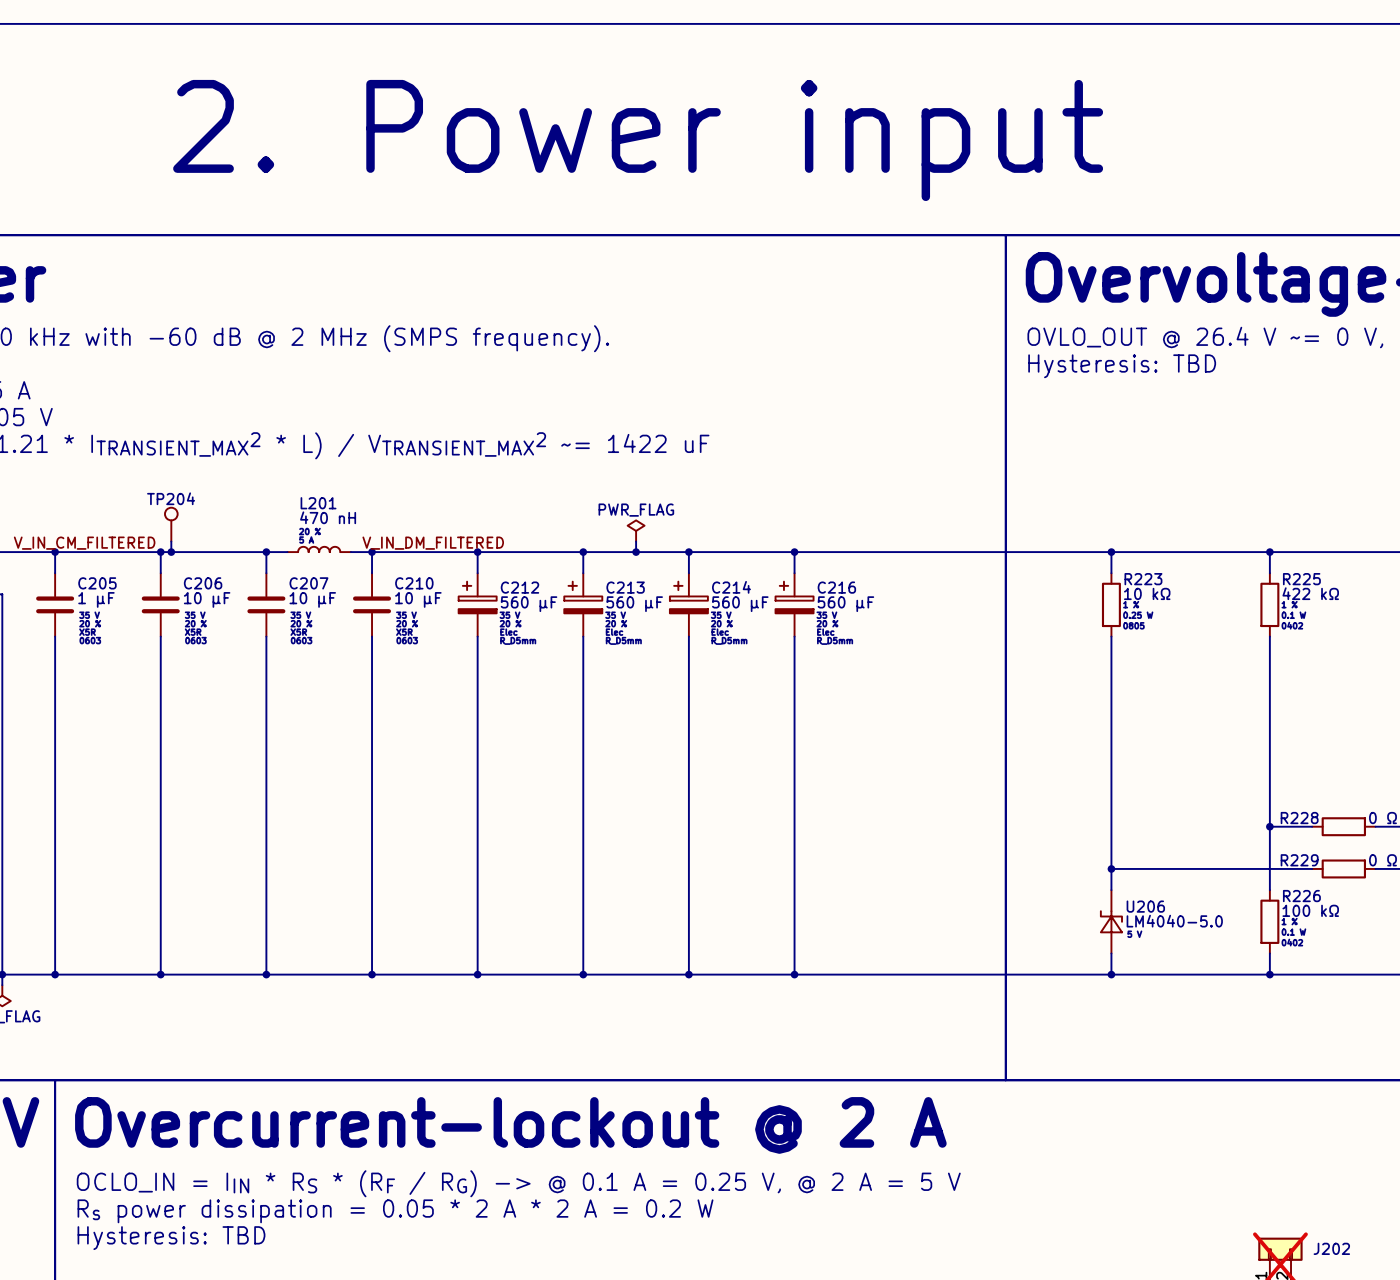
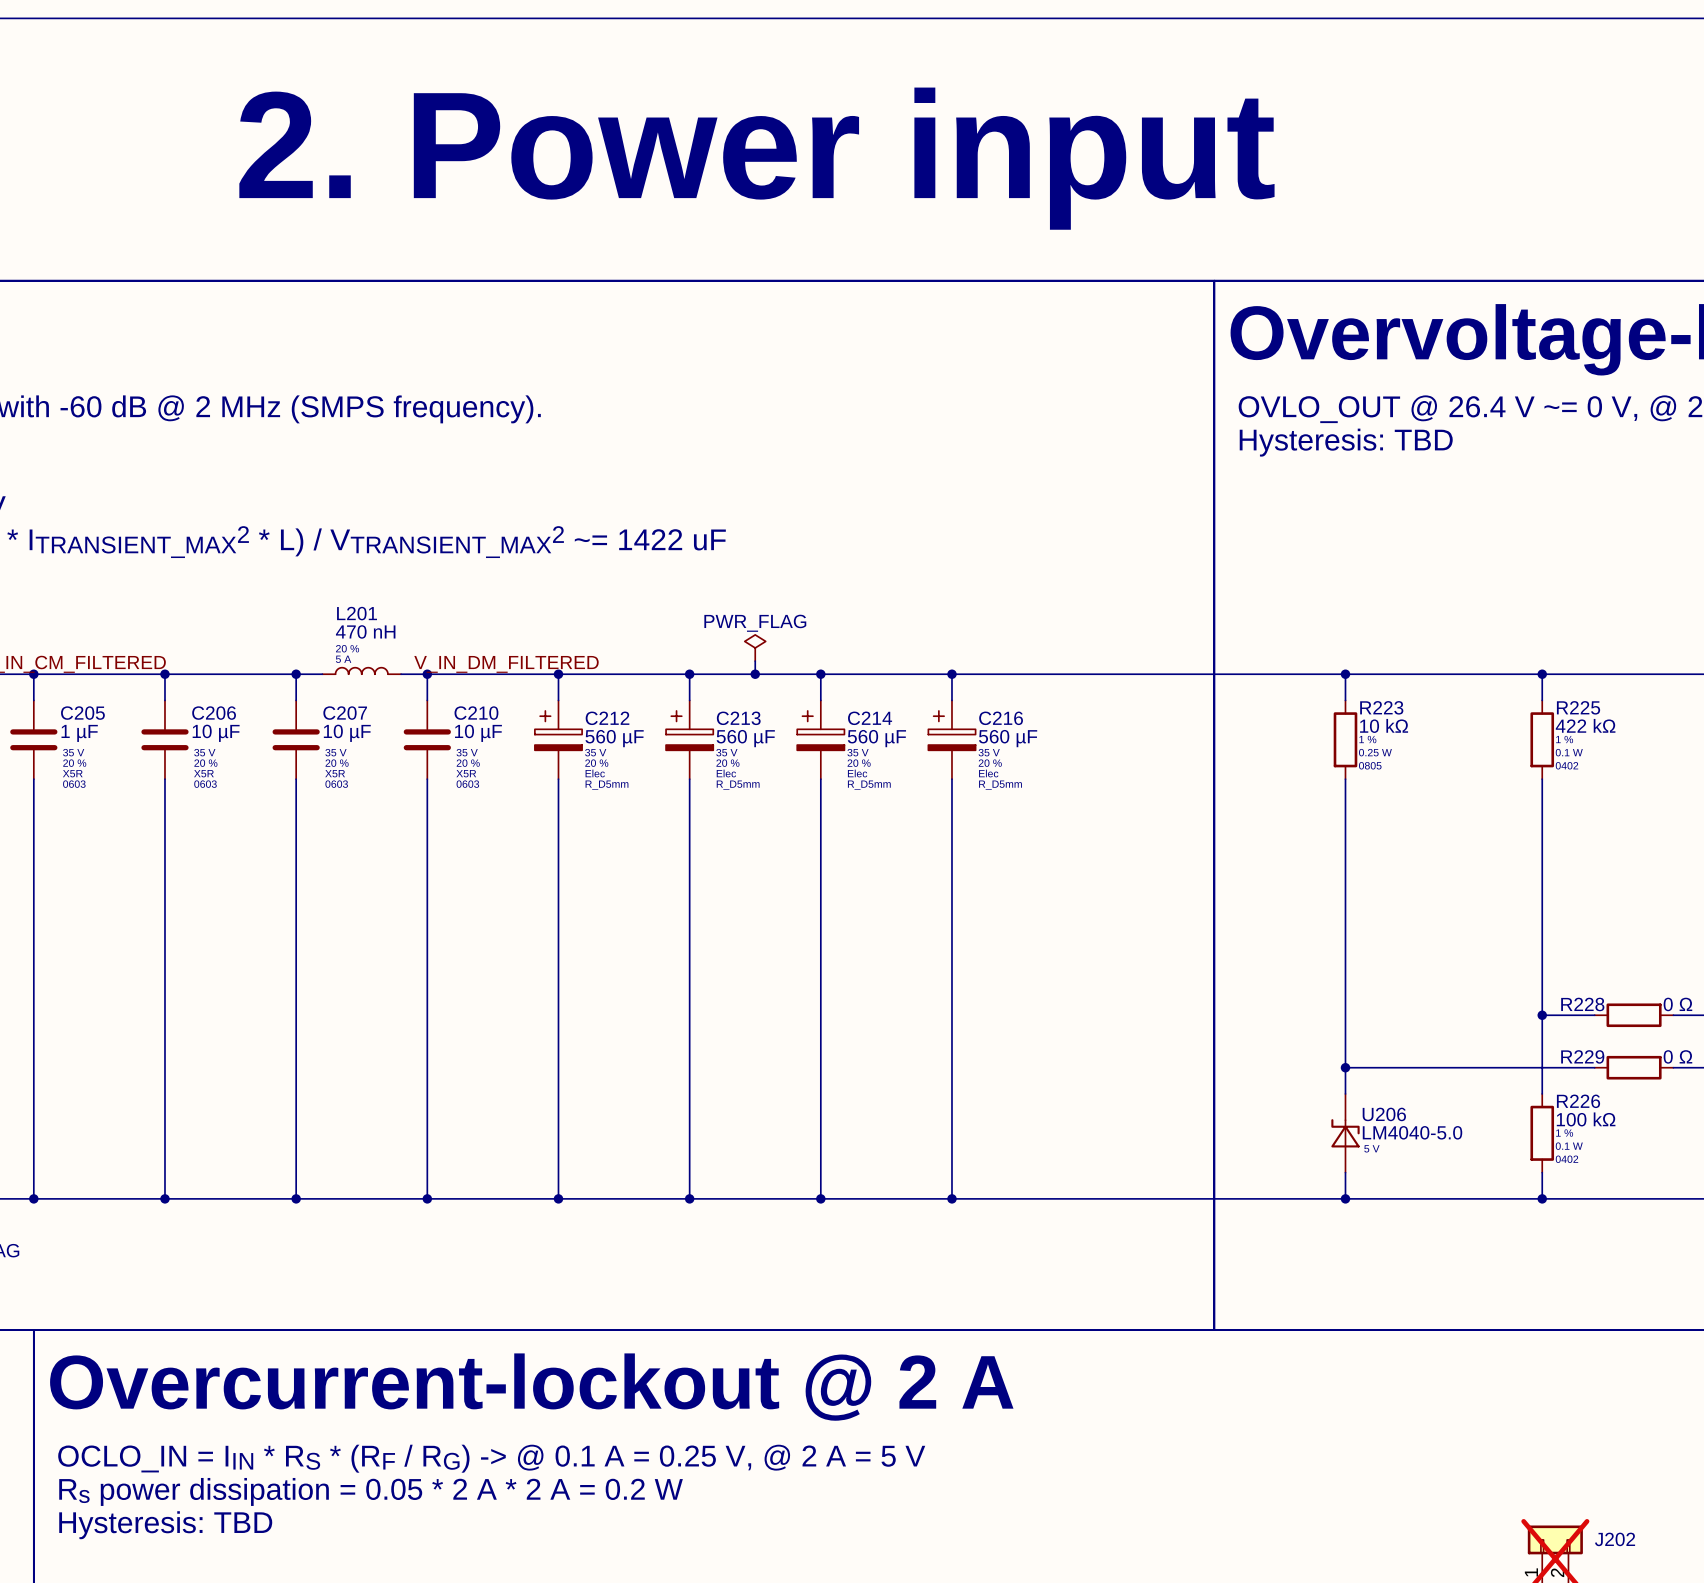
TP204: (171, 524) -> none
wire: (171, 541) (171, 552) -> none
junction: (171, 552) -> none

